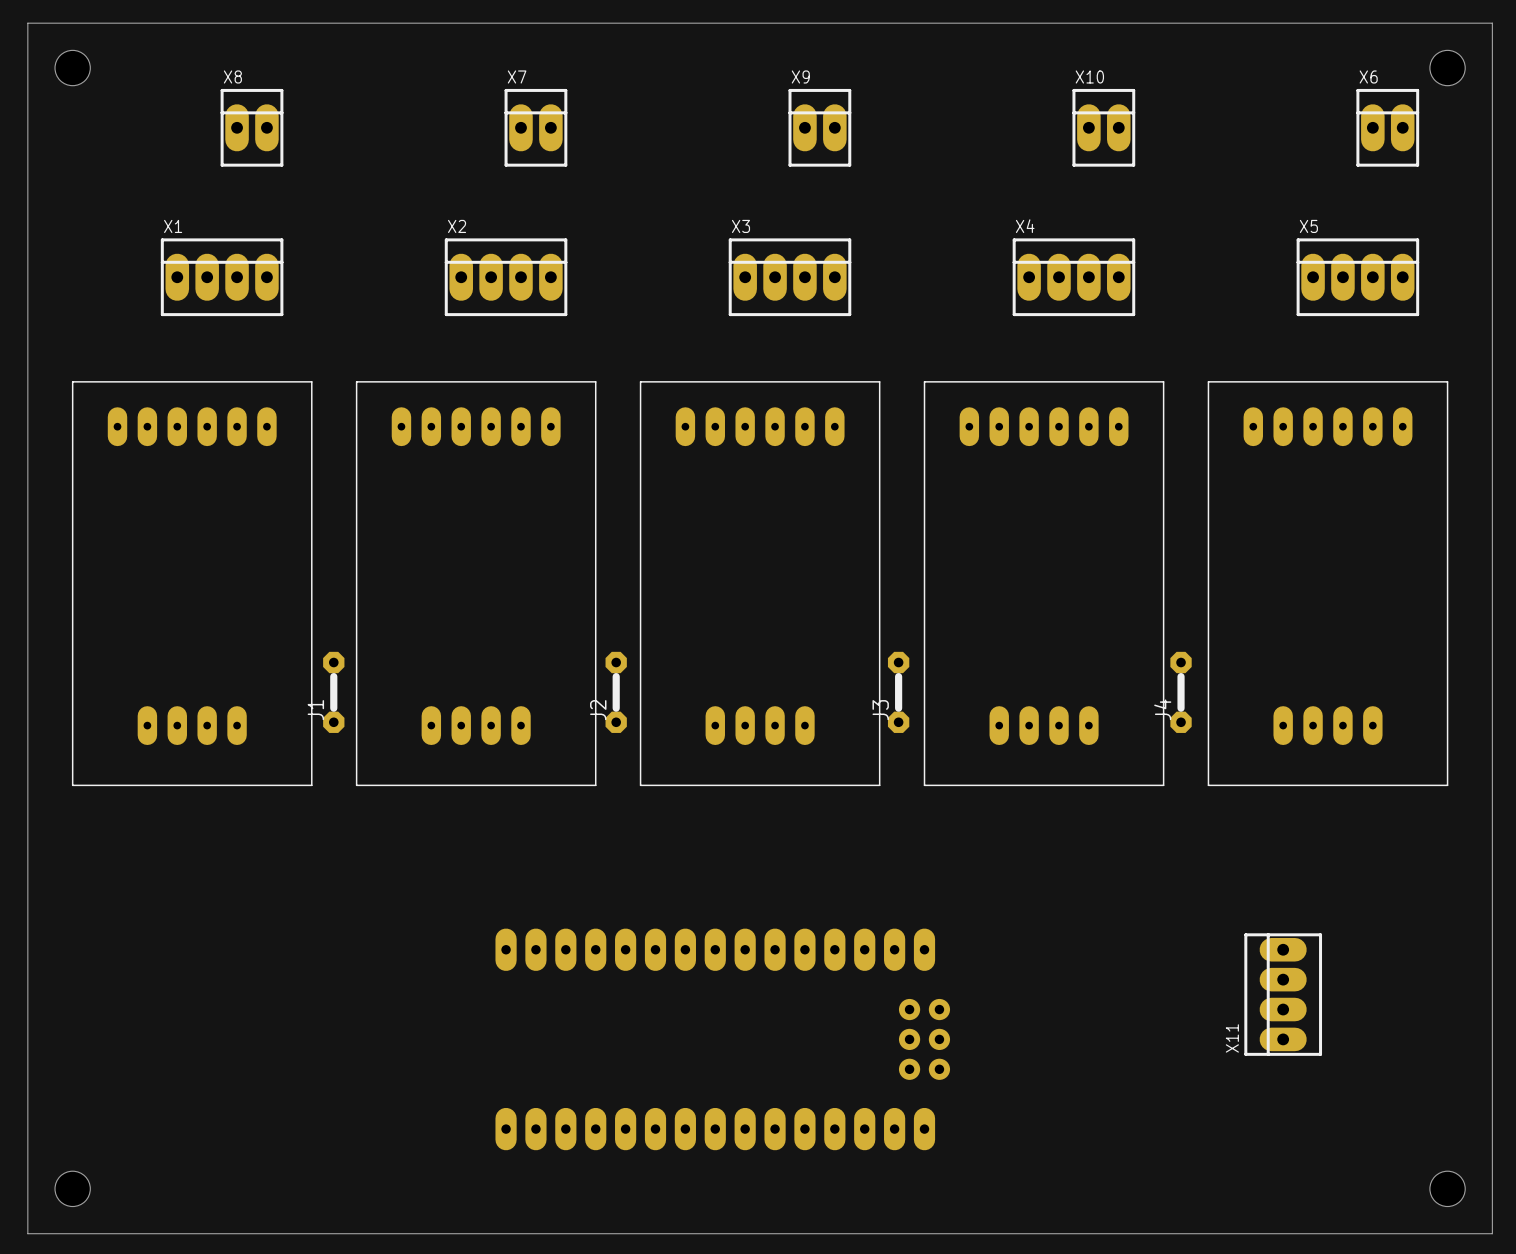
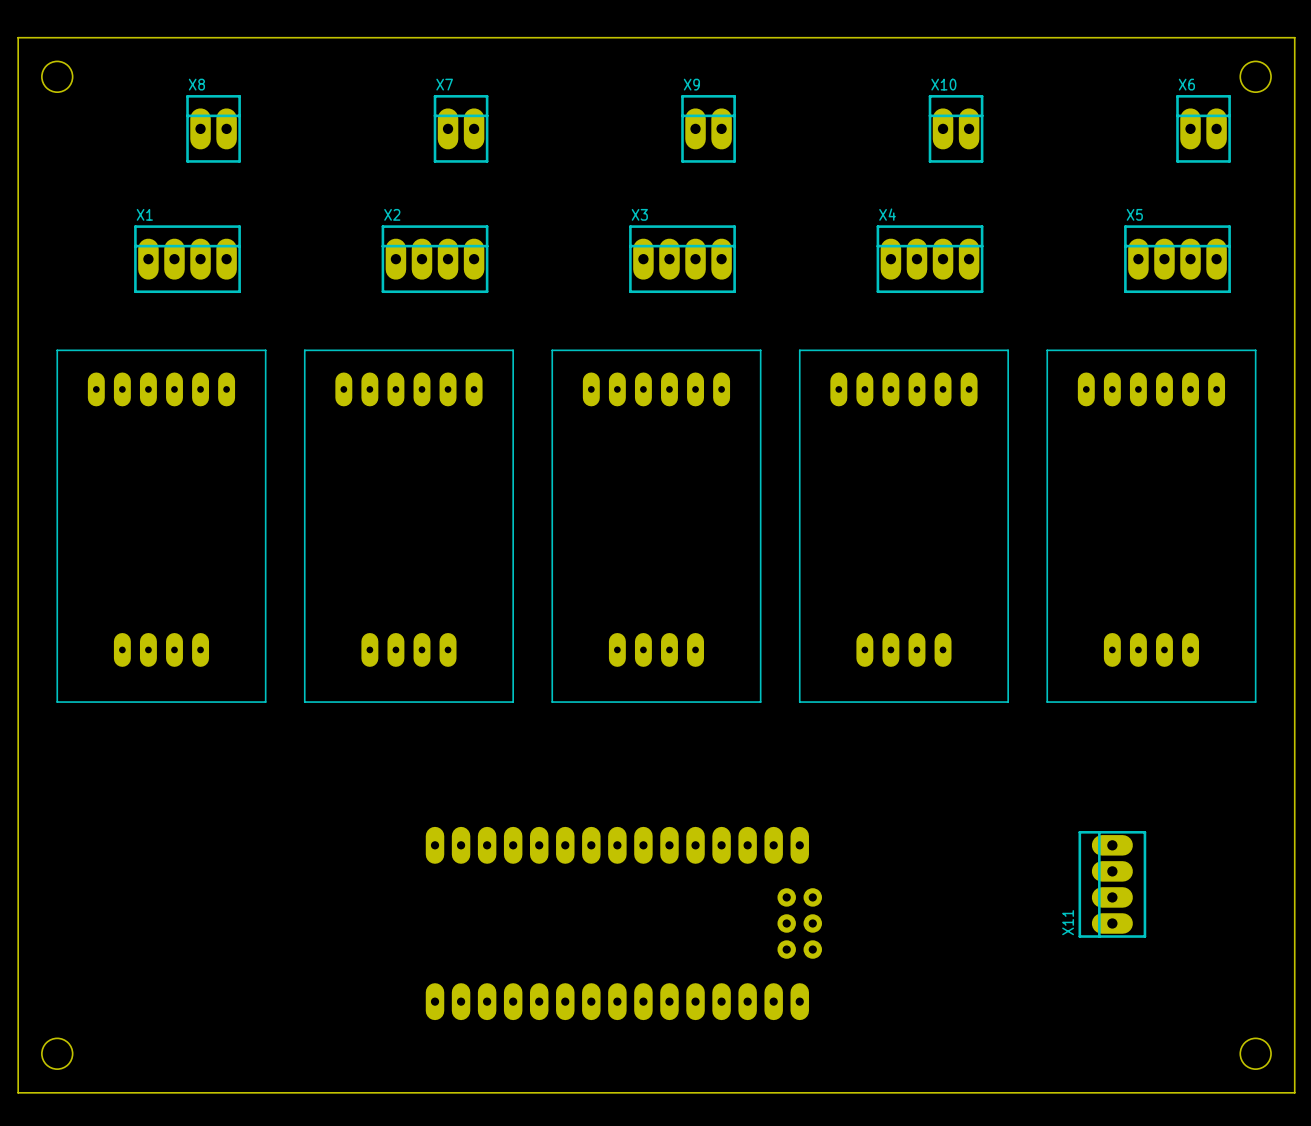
J1: (333, 692) -> none
J2: (616, 692) -> none
J3: (898, 692) -> none
J4: (1181, 692) -> none

